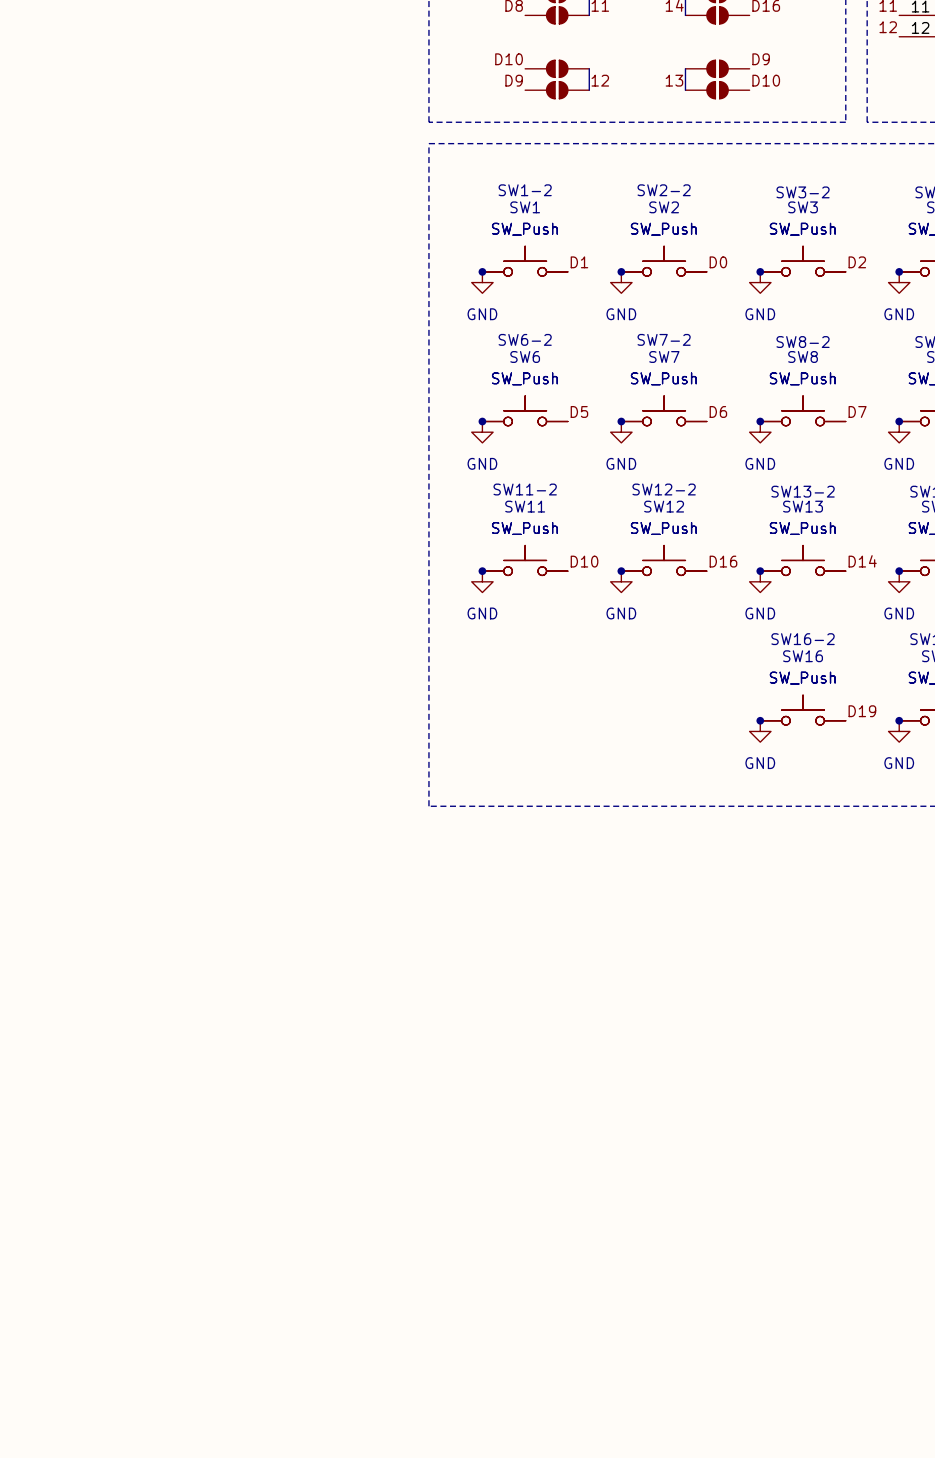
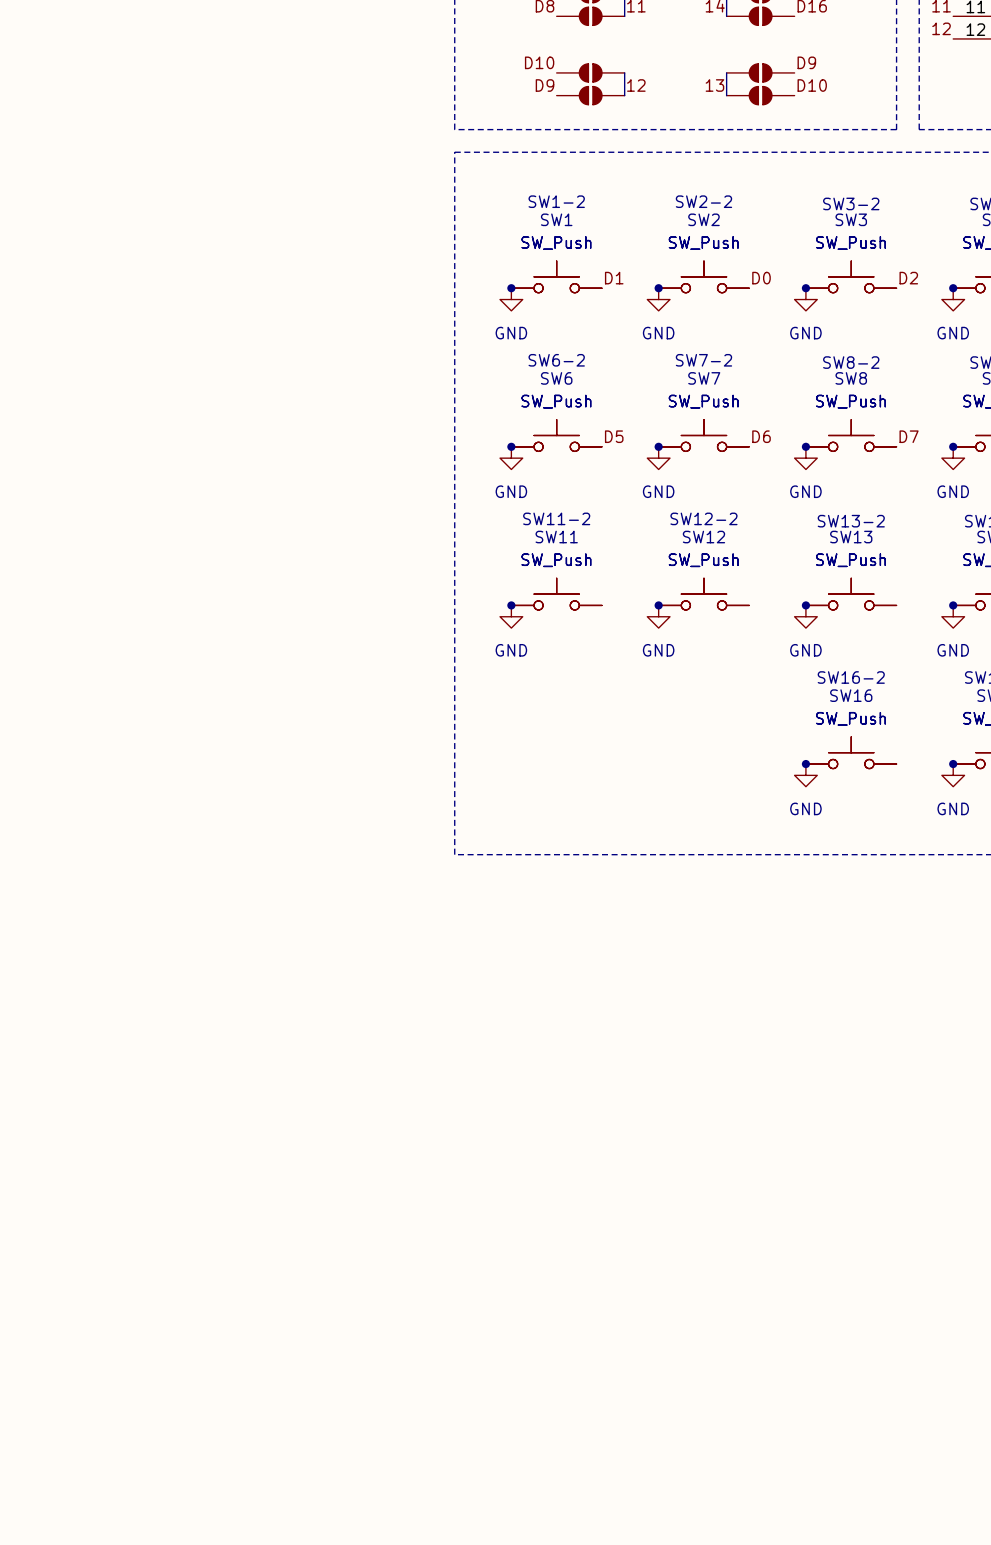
label: D10 (584, 561) -> none
label: D16 (723, 561) -> none
label: D14 (862, 561) -> none
label: D19 (862, 711) -> none

